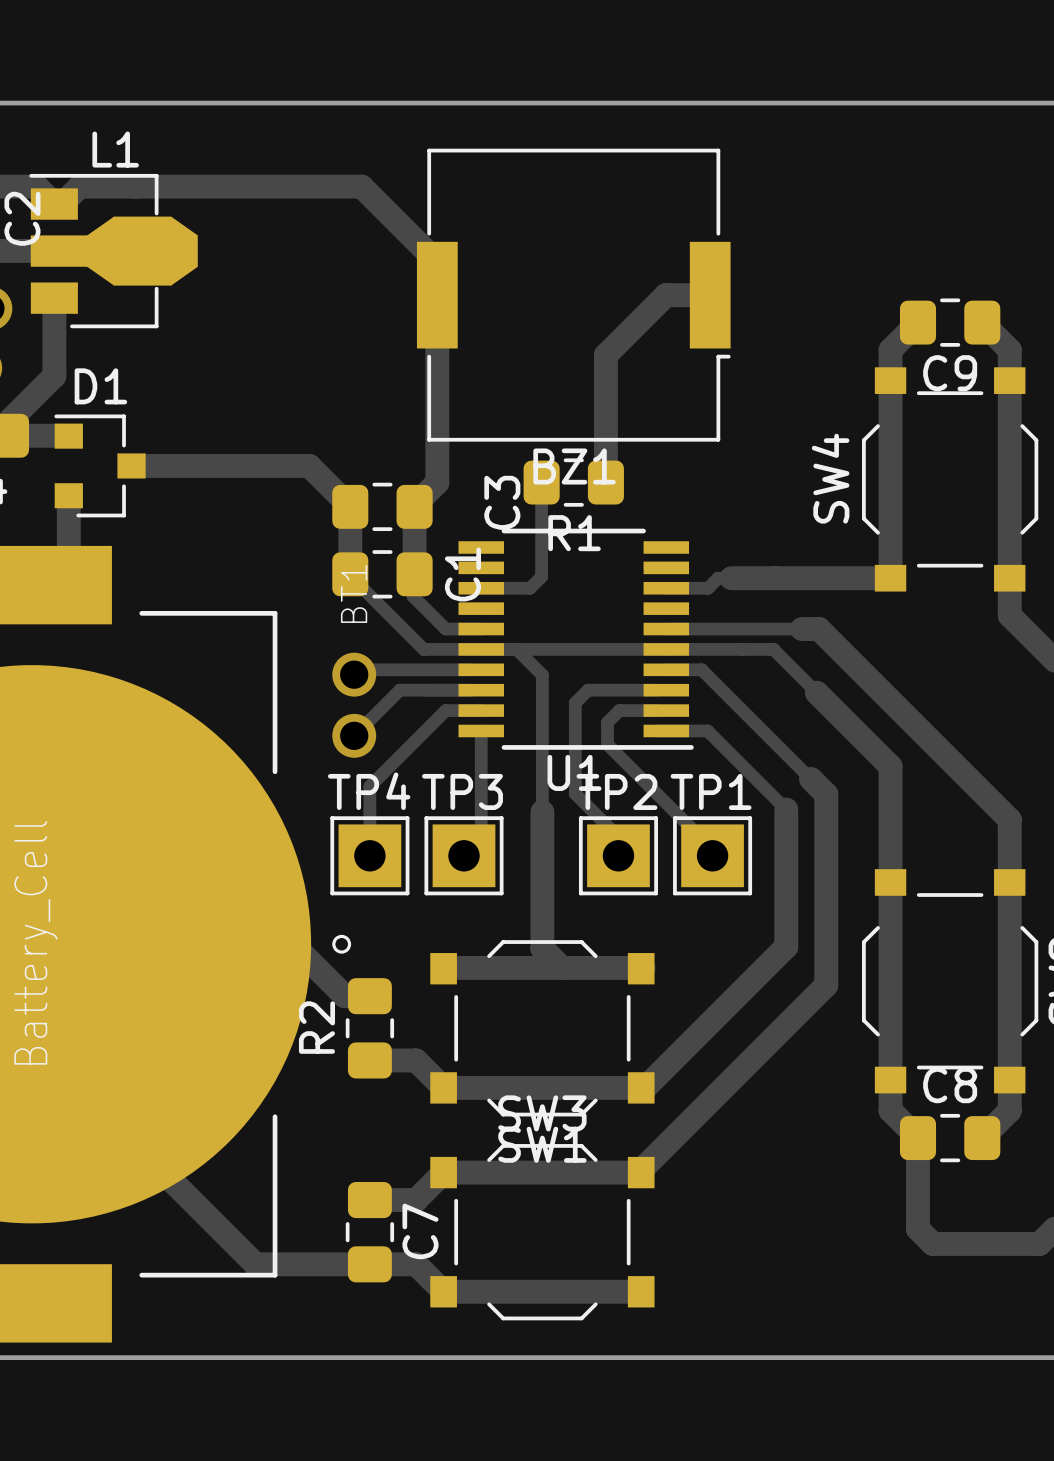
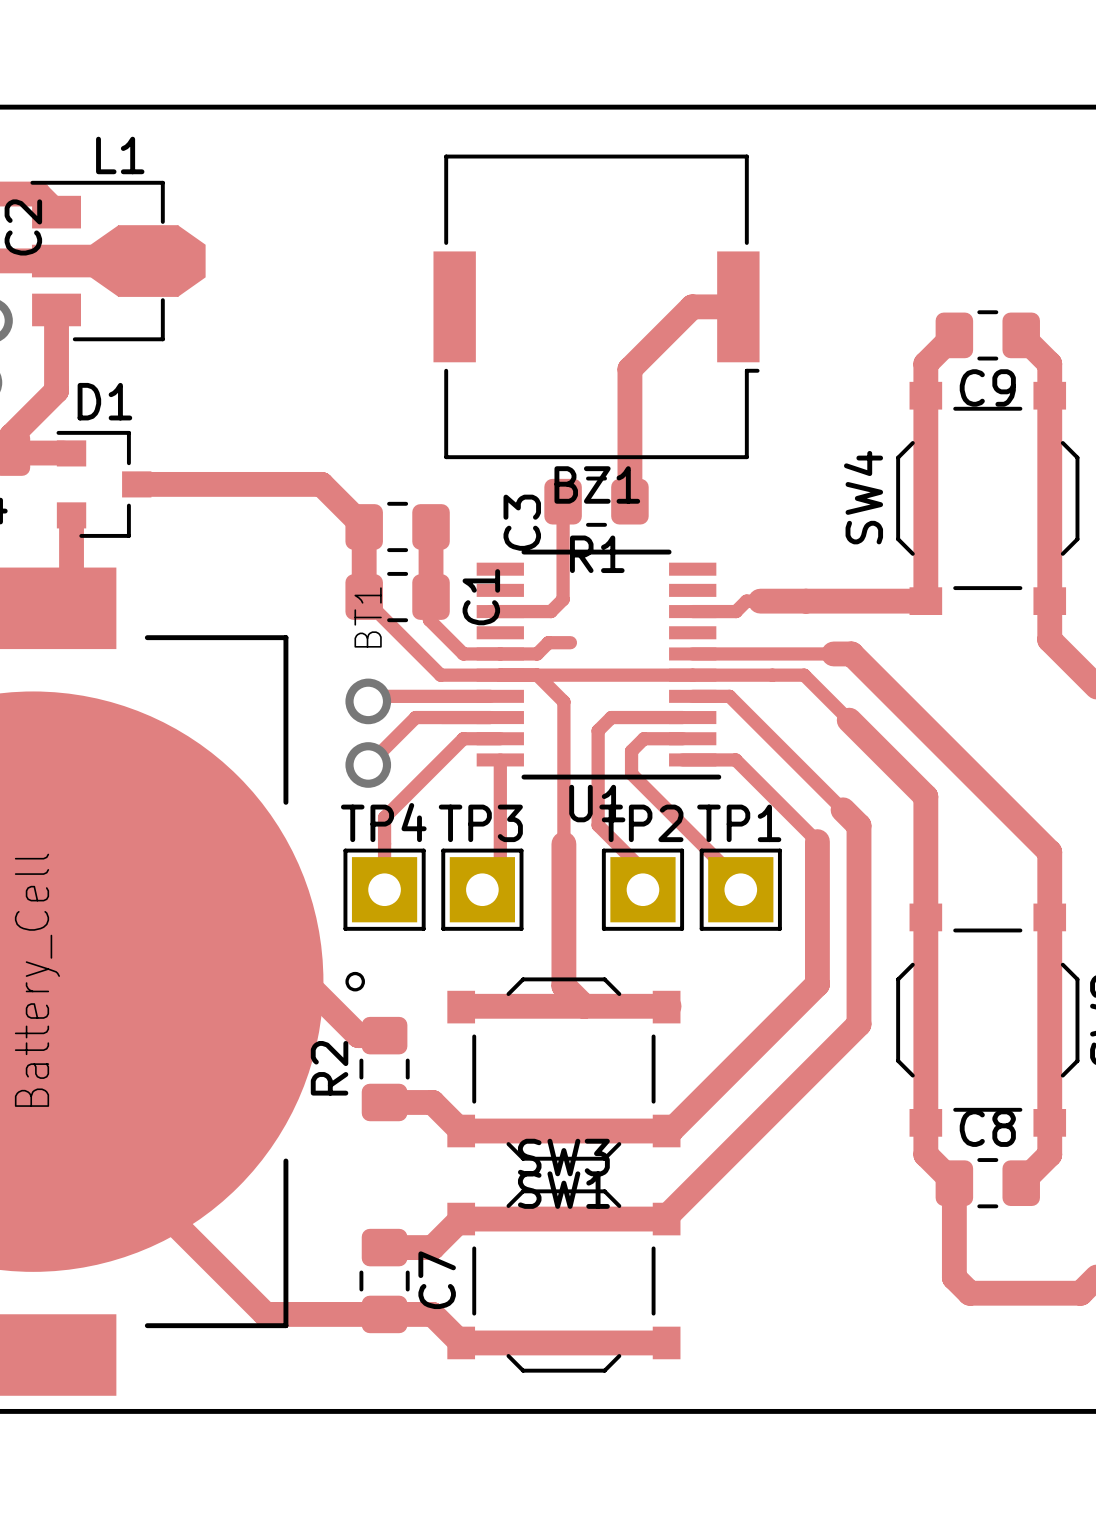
track: (62, 204) (79, 186) (361, 186) (437, 262) -> none
track: (437, 295) (437, 482) (413, 506) -> none
track: none -> (570, 642) (548, 642) (537, 653) (500, 653)

